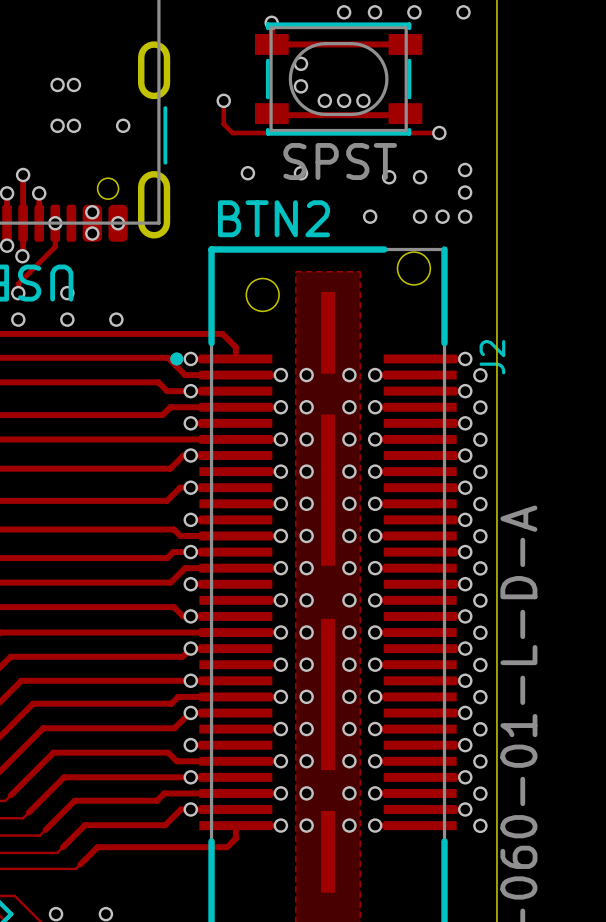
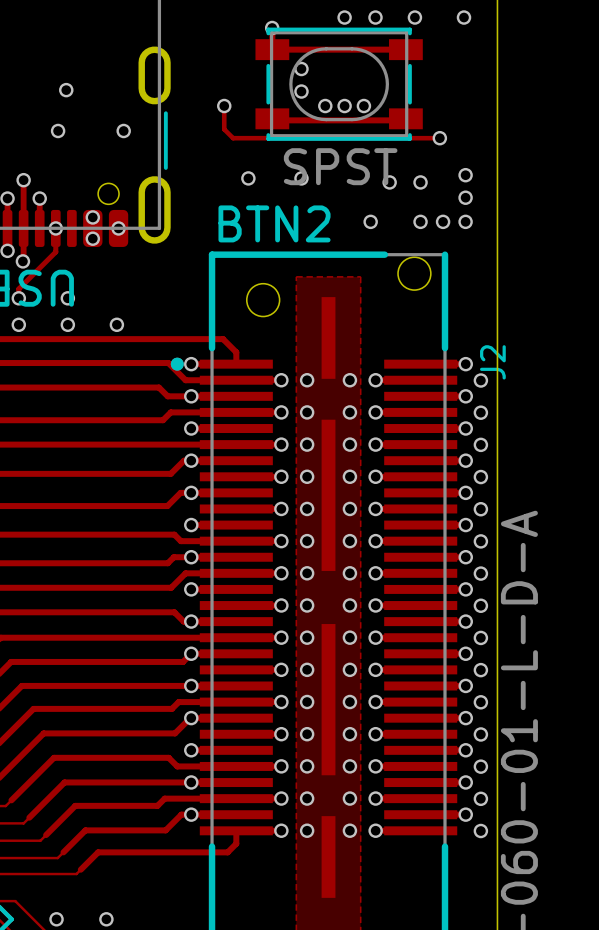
via: (57, 84) -> none
via: none -> (66, 90)
via: (73, 84) -> none
via: (73, 125) -> none

